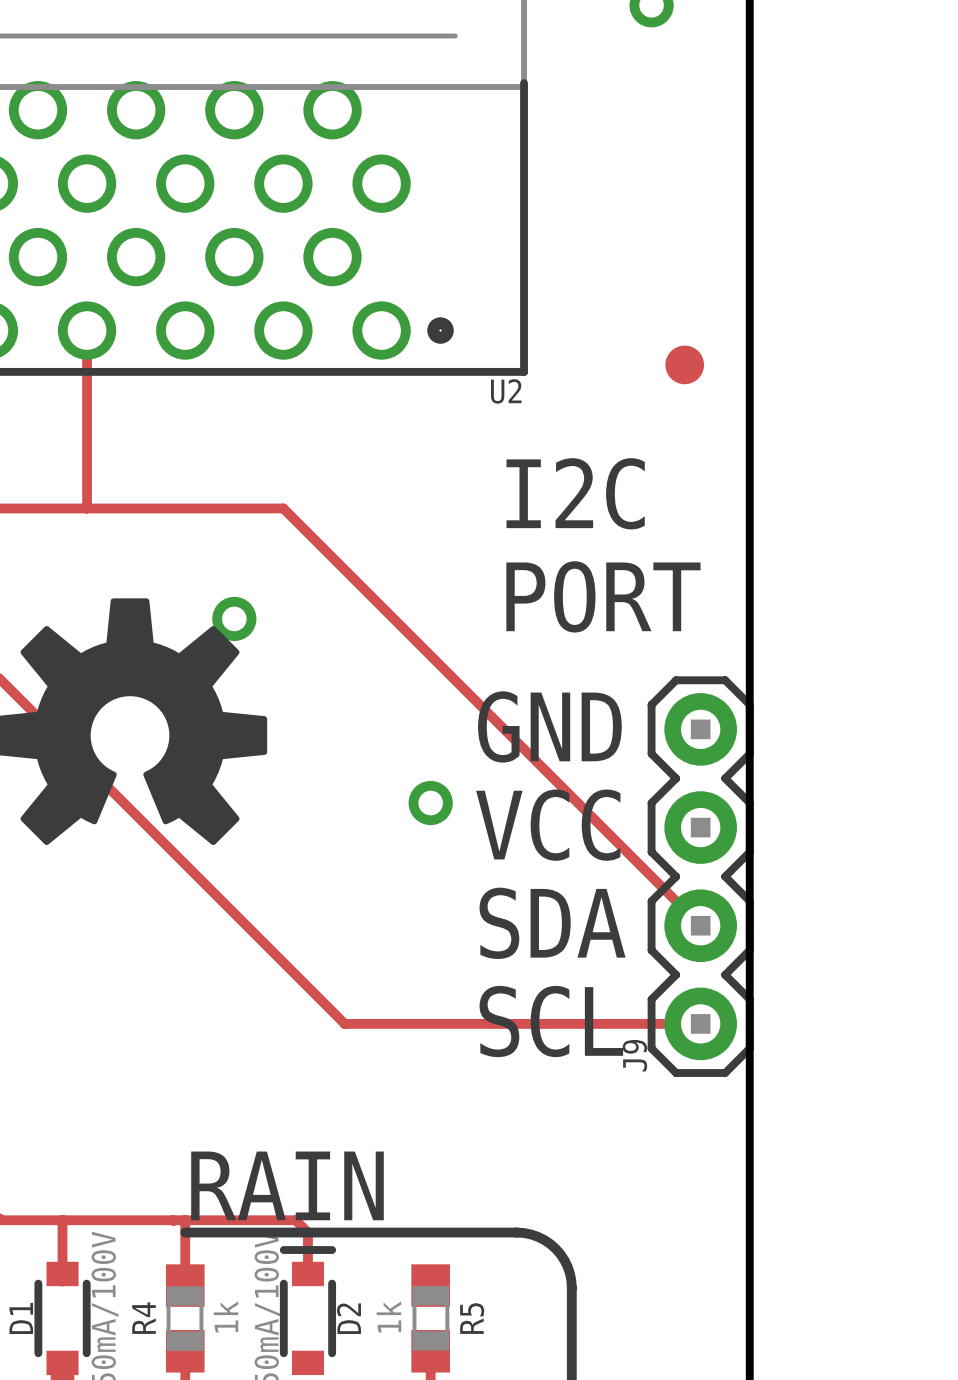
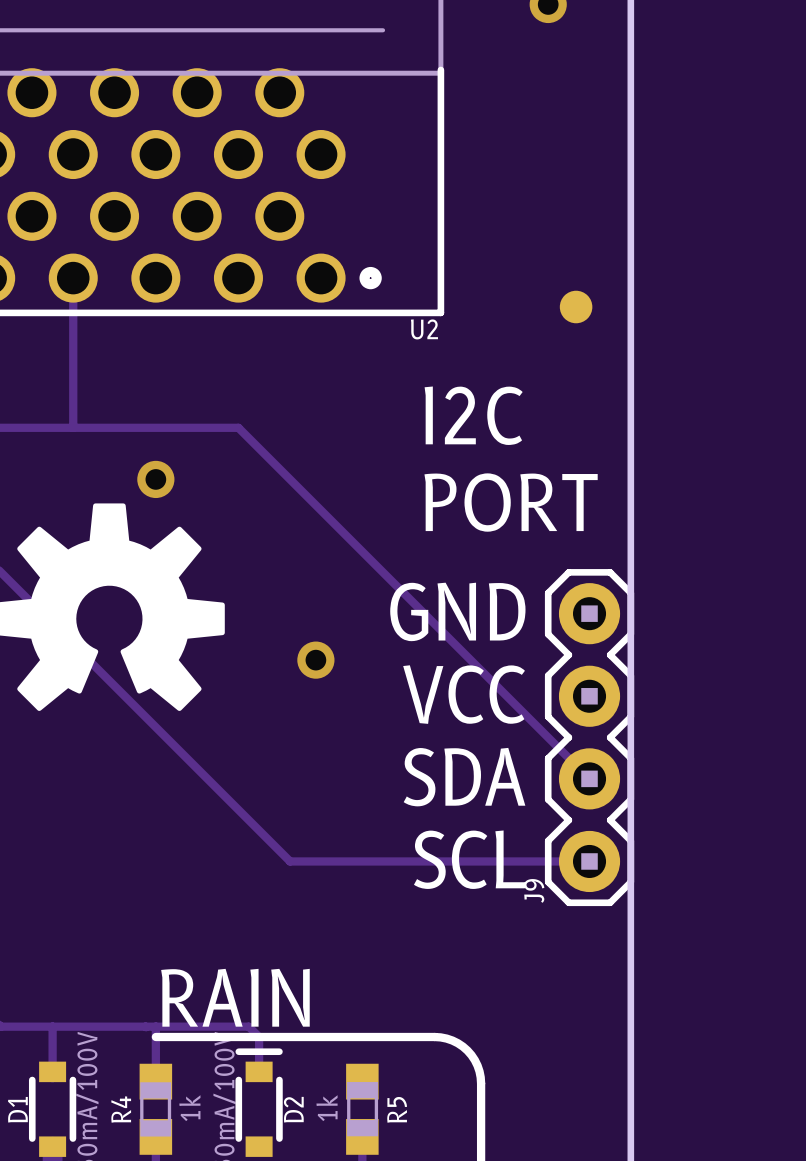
via position: (234, 618) -> (155, 479)
via position: (430, 803) -> (315, 660)

